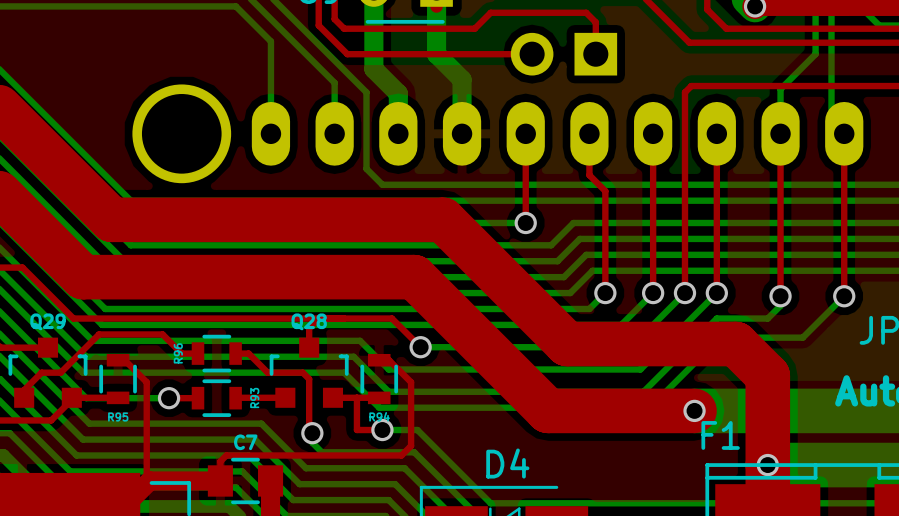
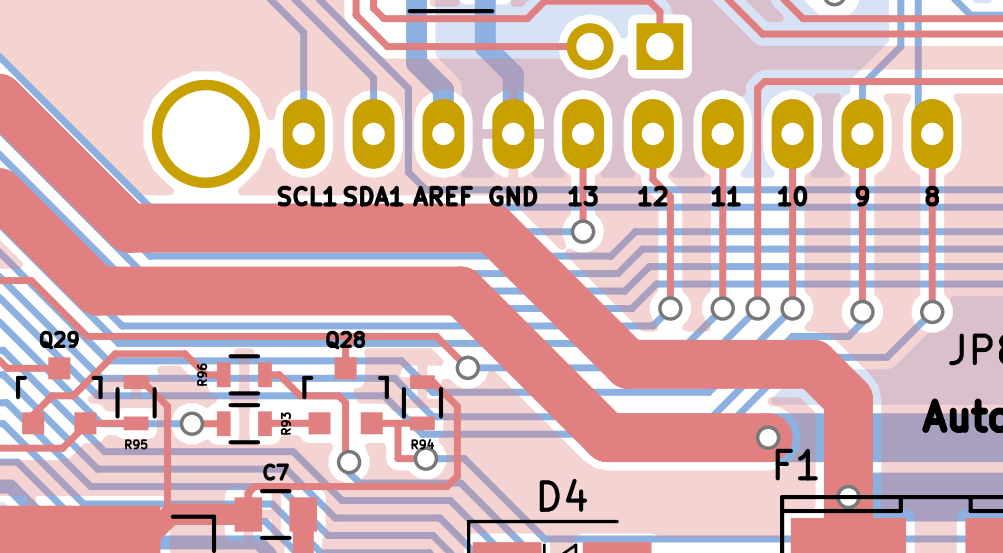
text: none -> SCL1 (307, 196)
text: none -> SDA1 (373, 196)
text: none -> AREF (443, 196)
text: none -> GND (513, 196)
text: none -> 13 (583, 196)
text: none -> 12 (652, 196)
text: none -> 11 (726, 196)
text: none -> 10 (792, 196)
text: none -> 9 (862, 196)
text: none -> 8 (932, 196)

